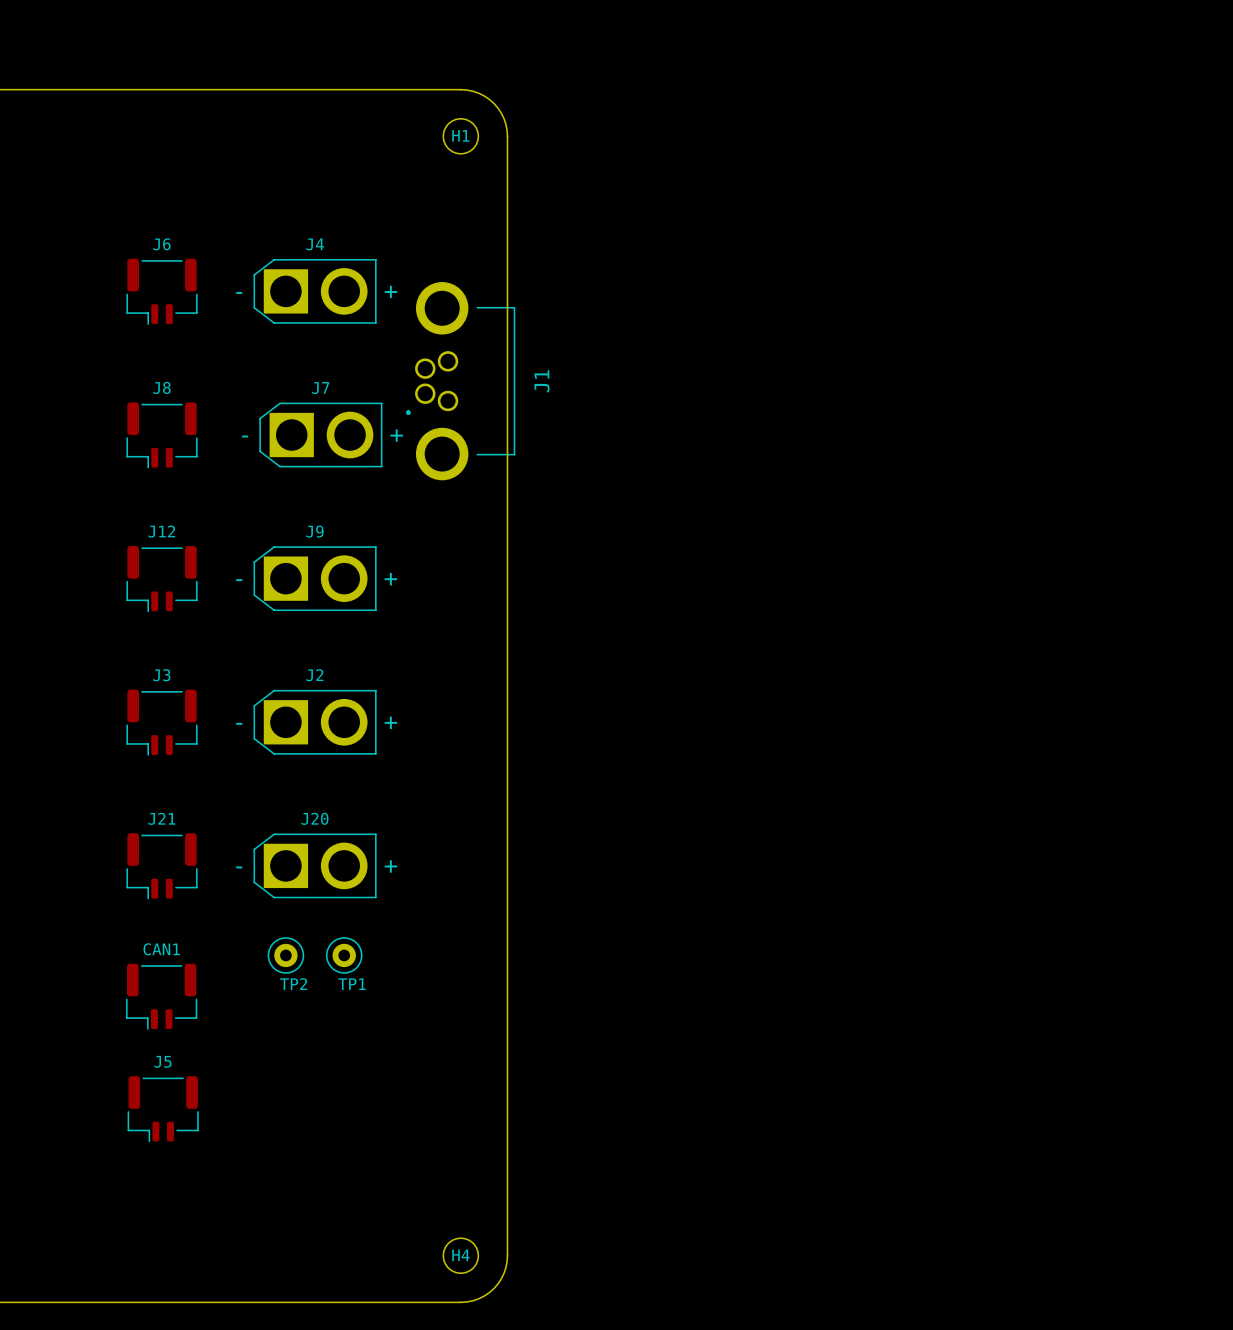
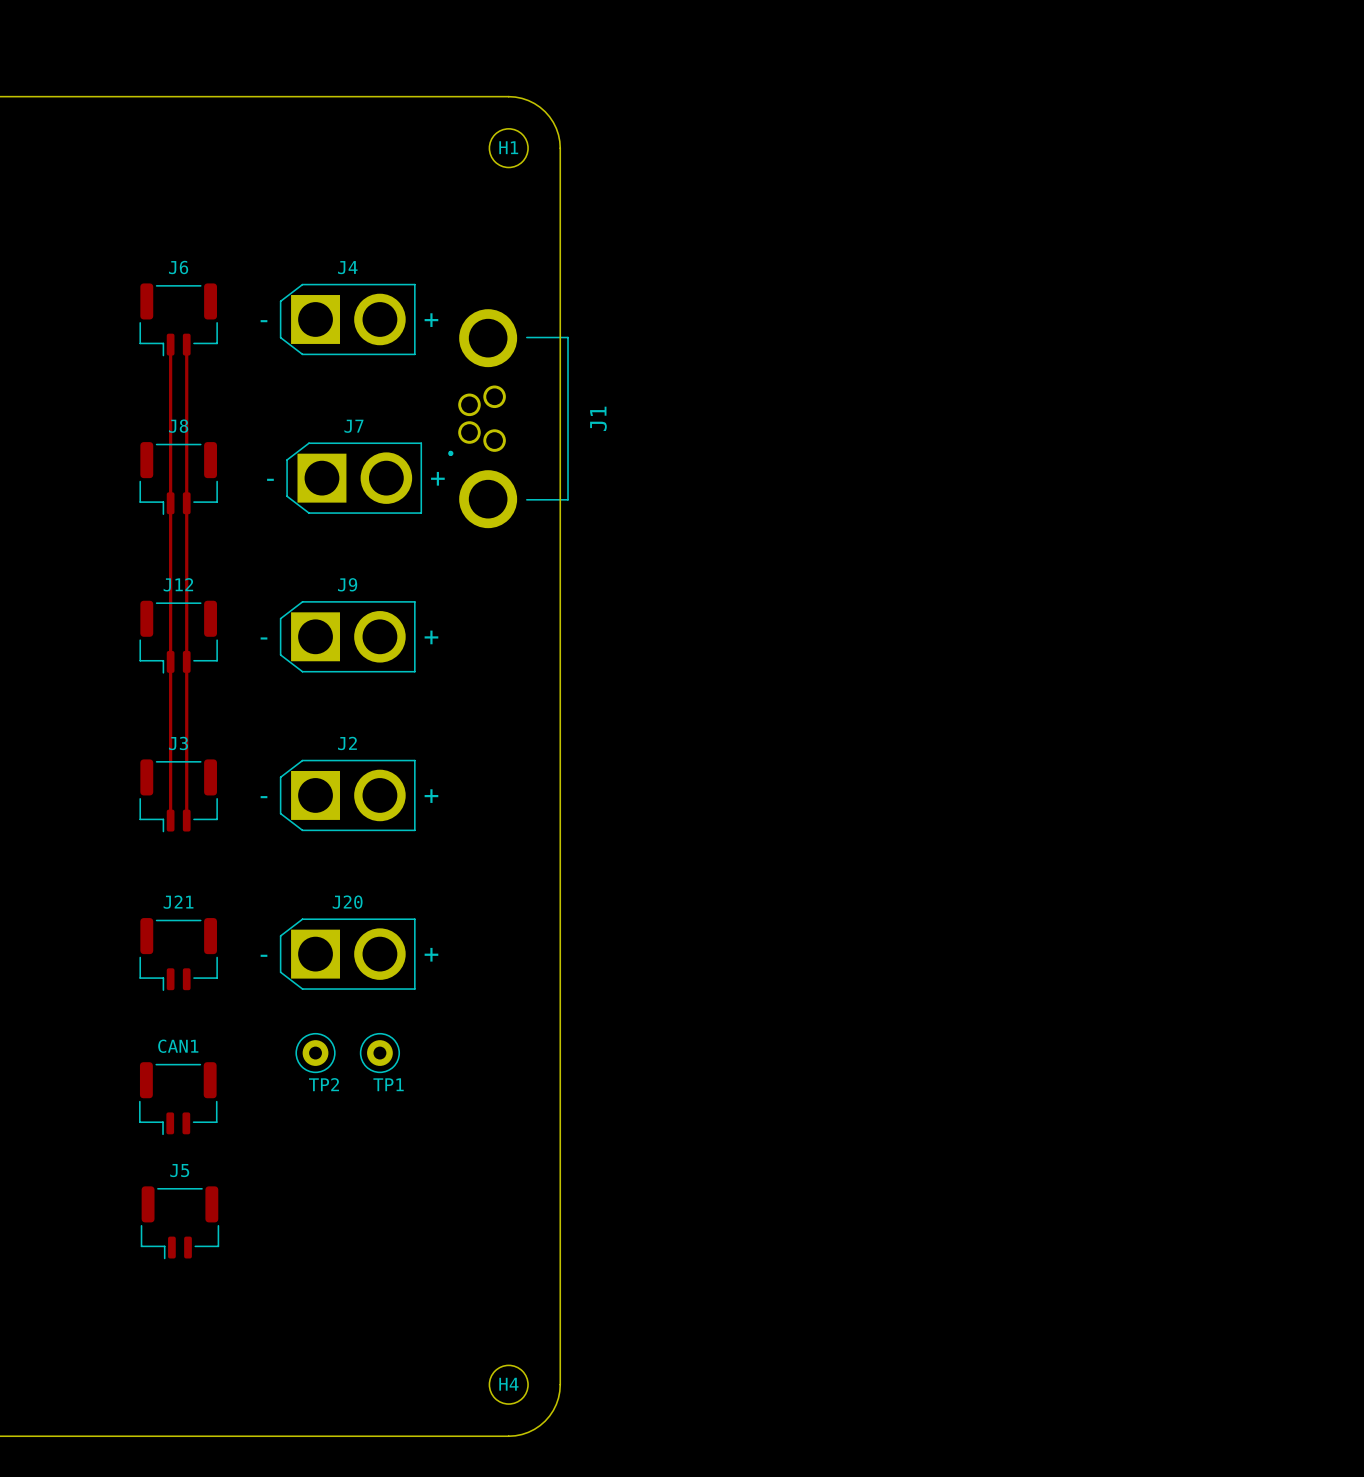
track: none -> (170, 344) (170, 820)
track: none -> (186, 344) (186, 820)

